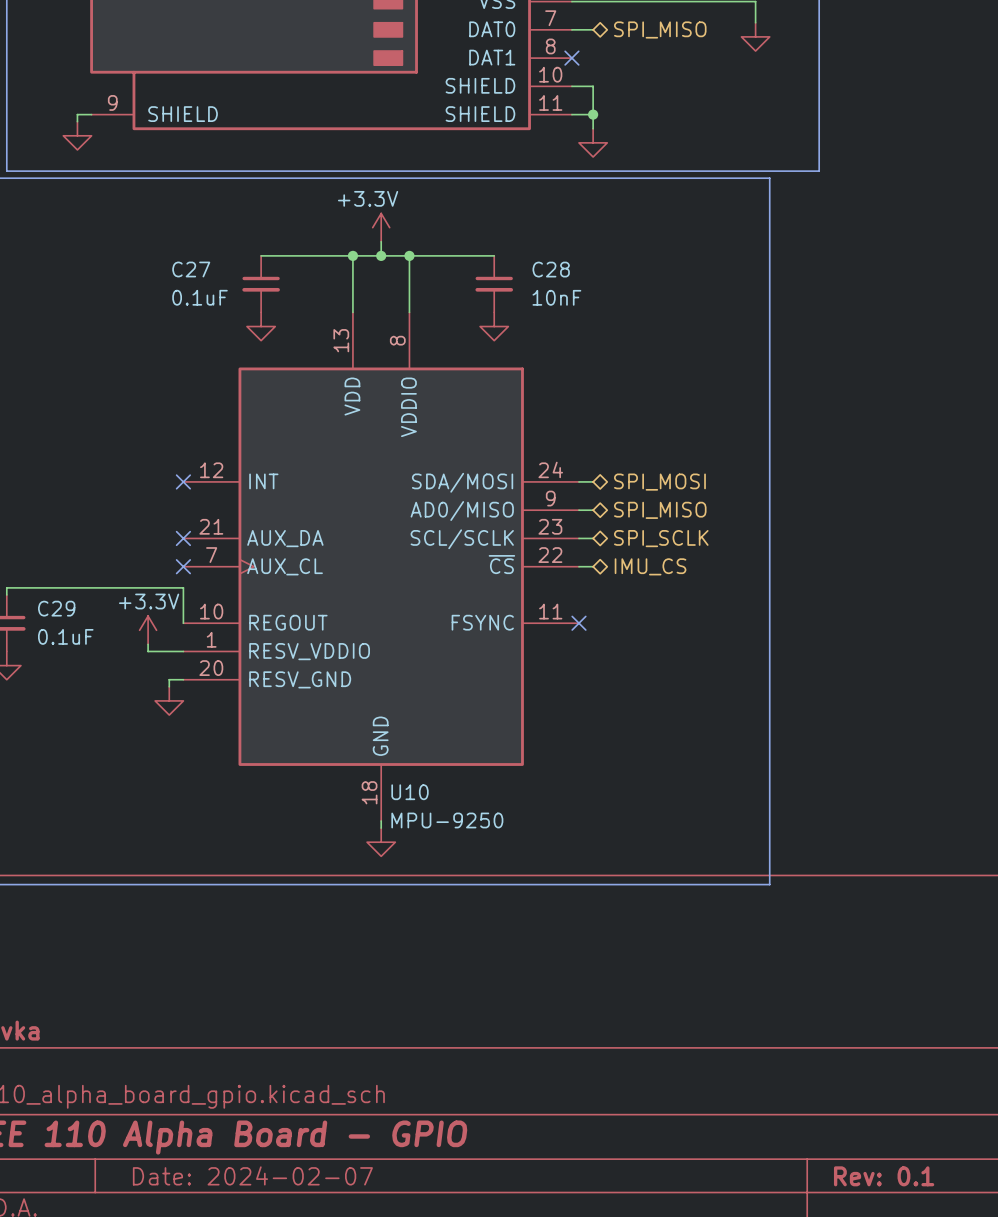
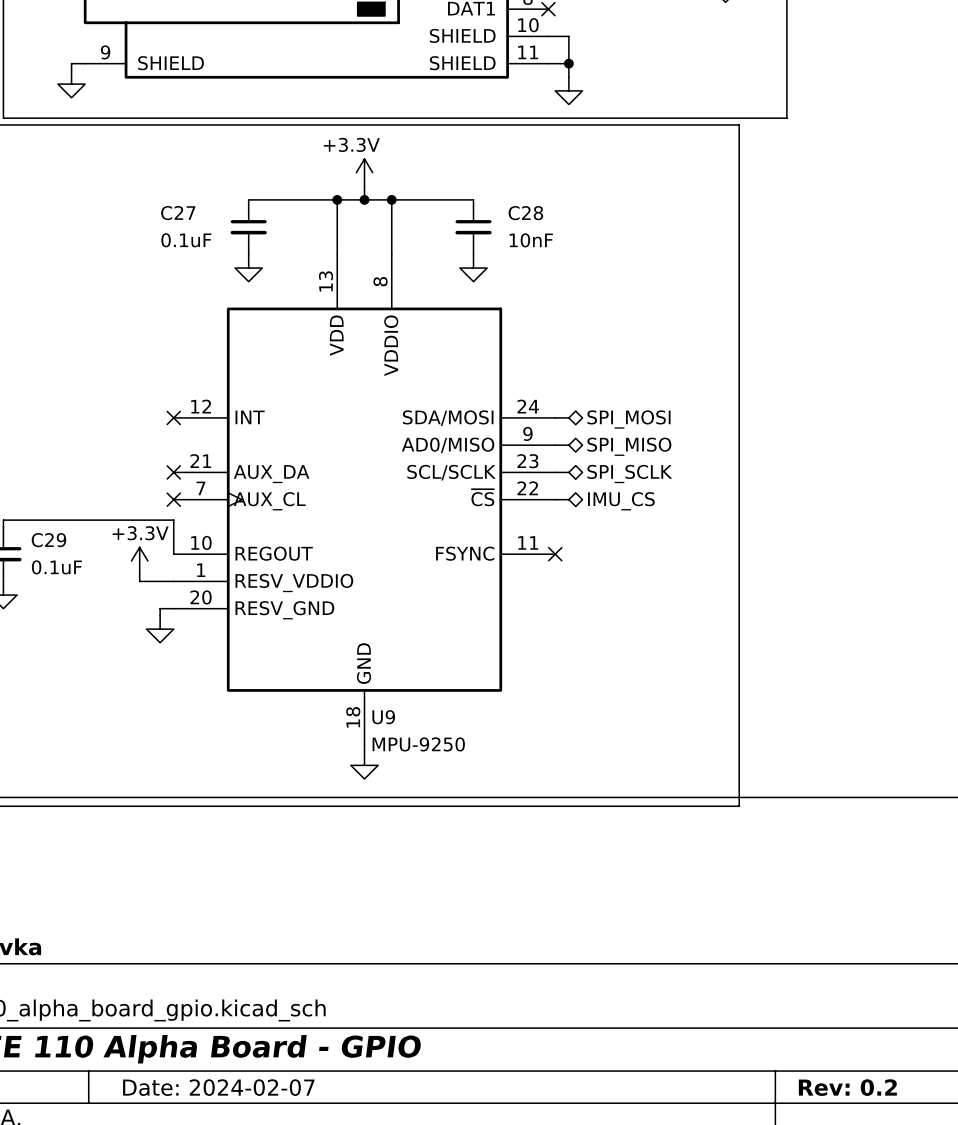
U10 name: U10 (410, 792) -> U9 (383, 717)
title block: Rev: 0.1 (884, 1176) -> Rev: 0.2 (847, 1087)

